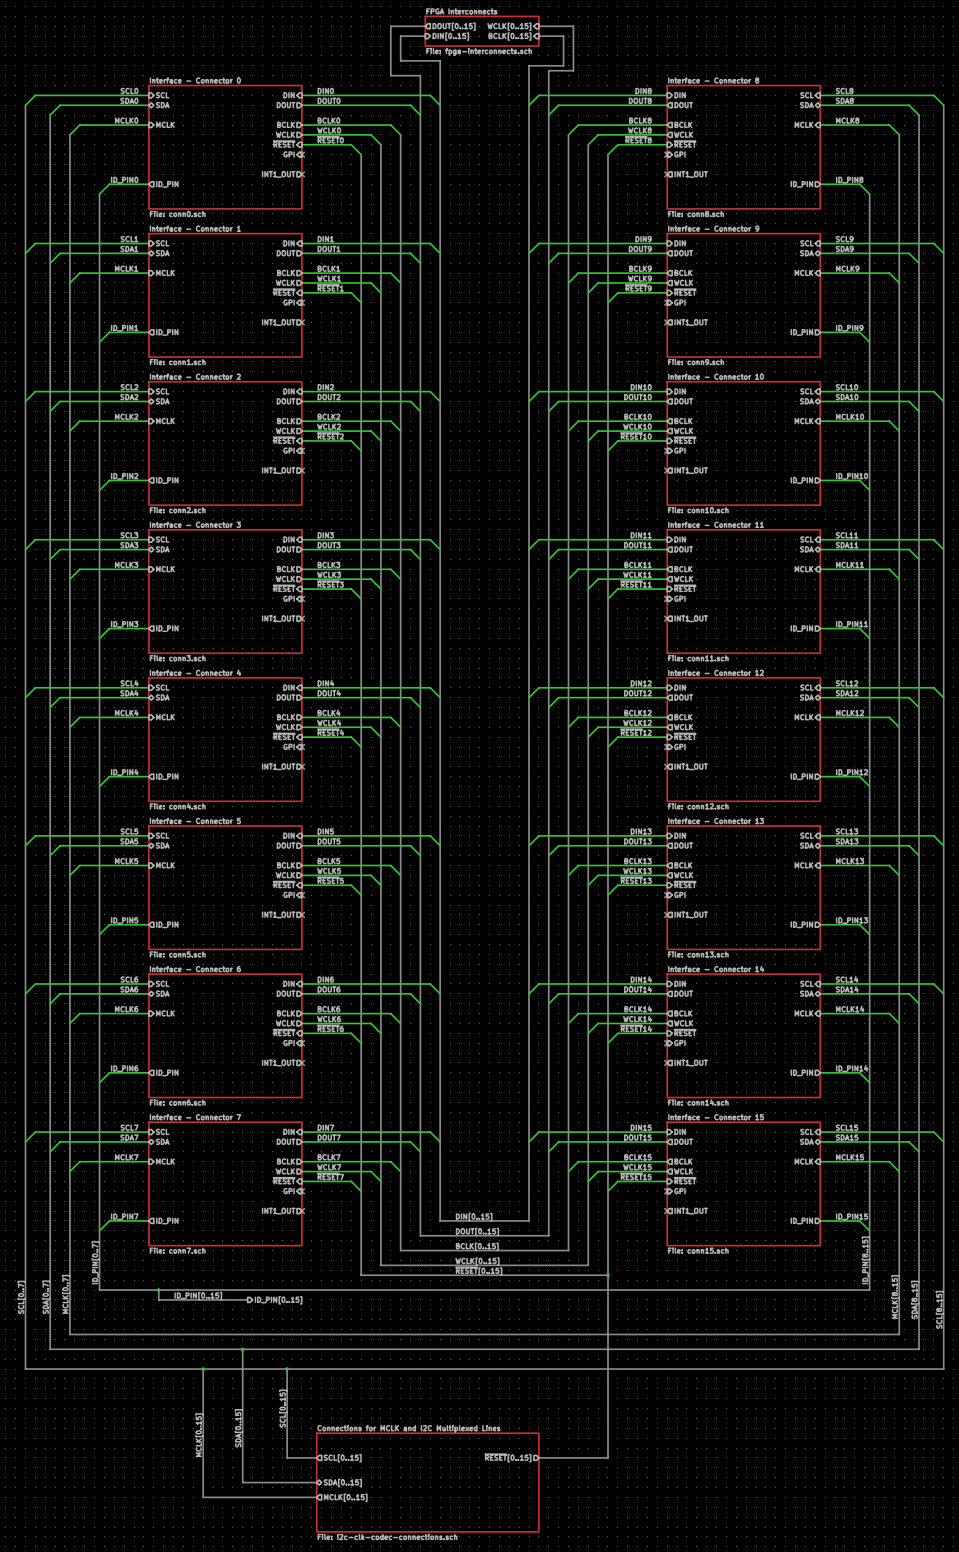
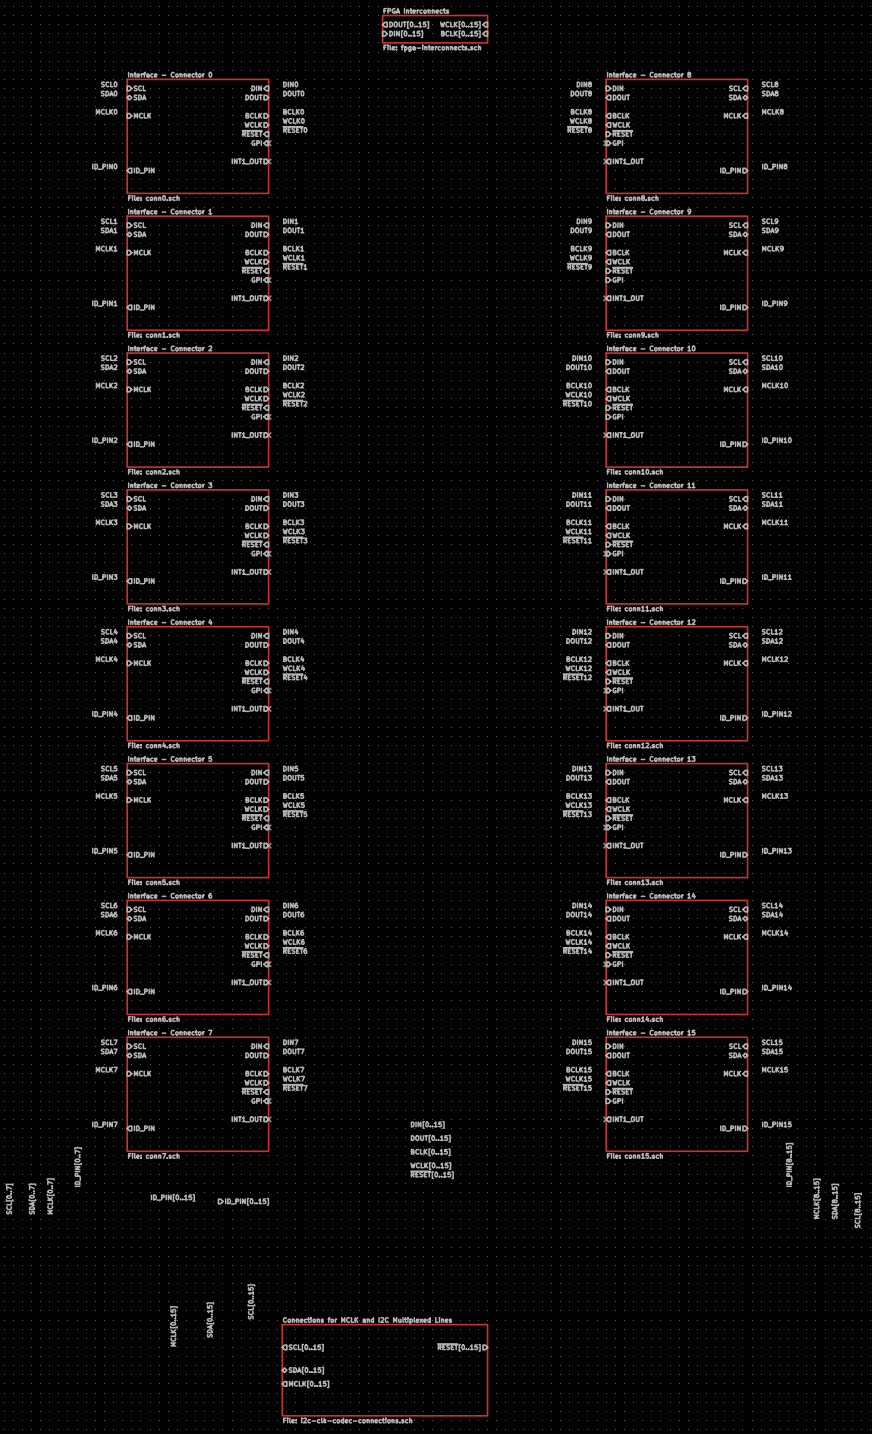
bus: (425, 26) (390, 26) (390, 75) (420, 75) (420, 1235) (548, 1235) (548, 70) (573, 70) (573, 26) (538, 26) -> none
bus: (425, 36) (400, 36) (400, 60) (440, 60) (440, 1220) (529, 1220) (529, 65) (563, 65) (563, 36) (538, 36) -> none
wire: (148, 95) (35, 95) (25, 105) -> none
wire: (301, 95) (430, 95) (440, 105) -> none
wire: (667, 95) (538, 95) (529, 105) -> none
wire: (820, 95) (933, 95) (943, 105) -> none
bus: (25, 105) (25, 1369) (943, 1369) (943, 105) -> none
wire: (148, 105) (60, 105) (50, 115) -> none
wire: (301, 105) (410, 105) (420, 115) -> none
wire: (667, 105) (558, 105) (548, 115) -> none
wire: (820, 105) (909, 105) (919, 115) -> none
bus: (50, 115) (50, 1349) (919, 1349) (919, 115) -> none
wire: (148, 125) (79, 125) (69, 134) -> none
wire: (301, 125) (390, 125) (400, 134) -> none
wire: (667, 125) (578, 125) (568, 134) -> none
wire: (820, 125) (889, 125) (899, 134) -> none
bus: (69, 134) (69, 1334) (899, 1334) (899, 134) -> none
wire: (301, 134) (371, 134) (380, 144) -> none
bus: (400, 134) (400, 1250) (568, 1250) (568, 134) -> none
wire: (667, 134) (598, 134) (588, 144) -> none
wire: (301, 144) (351, 144) (361, 154) -> none
bus: (380, 144) (380, 1265) (588, 1265) (588, 144) -> none
wire: (667, 144) (617, 144) (607, 154) -> none
bus: (361, 154) (361, 1275) (607, 1275) -> none
bus: (607, 154) (607, 1457) (538, 1457) -> none
wire: (148, 184) (109, 184) (99, 194) -> none
wire: (820, 184) (859, 184) (869, 194) -> none
bus: (99, 194) (99, 1290) (869, 1290) (869, 194) -> none
wire: (148, 243) (35, 243) (25, 253) -> none
wire: (301, 243) (430, 243) (440, 253) -> none
wire: (667, 243) (538, 243) (529, 253) -> none
wire: (820, 243) (933, 243) (943, 253) -> none
wire: (148, 253) (60, 253) (50, 263) -> none
wire: (301, 253) (410, 253) (420, 263) -> none
wire: (667, 253) (558, 253) (548, 263) -> none
wire: (820, 253) (909, 253) (919, 263) -> none
wire: (148, 273) (79, 273) (69, 282) -> none
wire: (301, 273) (390, 273) (400, 282) -> none
wire: (667, 273) (578, 273) (568, 282) -> none
wire: (820, 273) (889, 273) (899, 282) -> none
wire: (301, 282) (371, 282) (380, 292) -> none
wire: (667, 282) (598, 282) (588, 292) -> none
wire: (301, 292) (351, 292) (361, 302) -> none
wire: (667, 292) (617, 292) (607, 302) -> none
no-connect mark: (667, 302) -> none
wire: (148, 332) (109, 332) (99, 342) -> none
wire: (820, 332) (859, 332) (869, 342) -> none
wire: (148, 391) (35, 391) (25, 401) -> none
wire: (301, 391) (430, 391) (440, 401) -> none
wire: (667, 391) (538, 391) (529, 401) -> none
wire: (820, 391) (933, 391) (943, 401) -> none
wire: (148, 401) (60, 401) (50, 411) -> none
wire: (301, 401) (410, 401) (420, 411) -> none
wire: (667, 401) (558, 401) (548, 411) -> none
wire: (820, 401) (909, 401) (919, 411) -> none
wire: (148, 421) (79, 421) (69, 431) -> none
wire: (301, 421) (390, 421) (400, 431) -> none
wire: (667, 421) (578, 421) (568, 431) -> none
wire: (820, 421) (889, 421) (899, 431) -> none
wire: (301, 431) (371, 431) (380, 440) -> none
wire: (667, 431) (598, 431) (588, 440) -> none
wire: (301, 440) (351, 440) (361, 450) -> none
wire: (667, 440) (617, 440) (607, 450) -> none
no-connect mark: (667, 450) -> none
wire: (148, 480) (109, 480) (99, 490) -> none
wire: (820, 480) (859, 480) (869, 490) -> none
wire: (148, 539) (35, 539) (25, 549) -> none
wire: (301, 539) (430, 539) (440, 549) -> none
wire: (667, 539) (538, 539) (529, 549) -> none
wire: (820, 539) (933, 539) (943, 549) -> none
wire: (148, 549) (60, 549) (50, 559) -> none
wire: (301, 549) (410, 549) (420, 559) -> none
wire: (667, 549) (558, 549) (548, 559) -> none
wire: (820, 549) (909, 549) (919, 559) -> none
wire: (148, 569) (79, 569) (69, 579) -> none
wire: (301, 569) (390, 569) (400, 579) -> none
wire: (667, 569) (578, 569) (568, 579) -> none
wire: (820, 569) (889, 569) (899, 579) -> none
wire: (301, 579) (371, 579) (380, 589) -> none
wire: (667, 579) (598, 579) (588, 589) -> none
wire: (301, 589) (351, 589) (361, 598) -> none
wire: (667, 589) (617, 589) (607, 598) -> none
wire: (148, 628) (109, 628) (99, 638) -> none
wire: (820, 628) (859, 628) (869, 638) -> none
wire: (148, 687) (35, 687) (25, 697) -> none
wire: (301, 687) (430, 687) (440, 697) -> none
wire: (667, 687) (538, 687) (529, 697) -> none
wire: (820, 687) (933, 687) (943, 697) -> none
wire: (148, 697) (60, 697) (50, 707) -> none
wire: (301, 697) (410, 697) (420, 707) -> none
wire: (667, 697) (558, 697) (548, 707) -> none
wire: (820, 697) (909, 697) (919, 707) -> none
wire: (148, 717) (79, 717) (69, 727) -> none
wire: (301, 717) (390, 717) (400, 727) -> none
wire: (667, 717) (578, 717) (568, 727) -> none
wire: (820, 717) (889, 717) (899, 727) -> none
wire: (301, 727) (371, 727) (380, 737) -> none
wire: (667, 727) (598, 727) (588, 737) -> none
wire: (301, 737) (351, 737) (361, 747) -> none
wire: (667, 737) (617, 737) (607, 747) -> none
wire: (148, 776) (109, 776) (99, 786) -> none
wire: (820, 776) (859, 776) (869, 786) -> none
wire: (148, 835) (35, 835) (25, 845) -> none
wire: (301, 835) (430, 835) (440, 845) -> none
wire: (667, 835) (538, 835) (529, 845) -> none
wire: (820, 835) (933, 835) (943, 845) -> none
wire: (148, 845) (60, 845) (50, 855) -> none
wire: (301, 845) (410, 845) (420, 855) -> none
wire: (667, 845) (558, 845) (548, 855) -> none
wire: (820, 845) (909, 845) (919, 855) -> none
wire: (148, 865) (79, 865) (69, 875) -> none
wire: (301, 865) (390, 865) (400, 875) -> none
wire: (667, 865) (578, 865) (568, 875) -> none
wire: (820, 865) (889, 865) (899, 875) -> none
wire: (301, 875) (371, 875) (380, 885) -> none
wire: (667, 875) (598, 875) (588, 885) -> none
wire: (301, 885) (351, 885) (361, 895) -> none
wire: (667, 885) (617, 885) (607, 895) -> none
wire: (148, 924) (109, 924) (99, 934) -> none
wire: (820, 924) (859, 924) (869, 934) -> none
wire: (148, 983) (35, 983) (25, 993) -> none
wire: (301, 983) (430, 983) (440, 993) -> none
wire: (667, 983) (538, 983) (529, 993) -> none
wire: (820, 983) (933, 983) (943, 993) -> none
wire: (148, 993) (60, 993) (50, 1003) -> none
wire: (301, 993) (410, 993) (420, 1003) -> none
wire: (667, 993) (558, 993) (548, 1003) -> none
wire: (820, 993) (909, 993) (919, 1003) -> none
wire: (148, 1013) (79, 1013) (69, 1023) -> none
wire: (301, 1013) (390, 1013) (400, 1023) -> none
wire: (667, 1013) (578, 1013) (568, 1023) -> none
wire: (820, 1013) (889, 1013) (899, 1023) -> none
wire: (301, 1023) (371, 1023) (380, 1033) -> none
wire: (667, 1023) (598, 1023) (588, 1033) -> none
wire: (301, 1033) (351, 1033) (361, 1043) -> none
wire: (667, 1033) (617, 1033) (607, 1043) -> none
wire: (148, 1072) (109, 1072) (99, 1082) -> none
wire: (820, 1072) (859, 1072) (869, 1082) -> none
wire: (148, 1132) (35, 1132) (25, 1141) -> none
wire: (301, 1132) (430, 1132) (440, 1141) -> none
wire: (667, 1132) (538, 1132) (529, 1141) -> none
wire: (820, 1132) (933, 1132) (943, 1141) -> none
wire: (148, 1141) (60, 1141) (50, 1151) -> none
wire: (301, 1141) (410, 1141) (420, 1151) -> none
wire: (667, 1141) (558, 1141) (548, 1151) -> none
wire: (820, 1141) (909, 1141) (919, 1151) -> none
wire: (148, 1161) (79, 1161) (69, 1171) -> none
wire: (301, 1161) (390, 1161) (400, 1171) -> none
wire: (667, 1161) (578, 1161) (568, 1171) -> none
wire: (820, 1161) (889, 1161) (899, 1171) -> none
wire: (301, 1171) (371, 1171) (380, 1181) -> none
wire: (667, 1171) (598, 1171) (588, 1181) -> none
wire: (301, 1181) (351, 1181) (361, 1191) -> none
wire: (667, 1181) (617, 1181) (607, 1191) -> none
no-connect mark: (667, 1191) -> none
wire: (148, 1220) (109, 1220) (99, 1230) -> none
wire: (820, 1220) (859, 1220) (869, 1230) -> none
junction: (607, 1275) -> none
bus: (158, 1290) (158, 1299) (247, 1299) -> none
junction: (158, 1290) -> none
bus: (242, 1349) (242, 1482) (316, 1482) -> none
junction: (242, 1349) -> none
bus: (203, 1369) (203, 1497) (316, 1497) -> none
junction: (203, 1369) -> none
bus: (287, 1369) (287, 1457) (316, 1457) -> none
junction: (287, 1369) -> none

